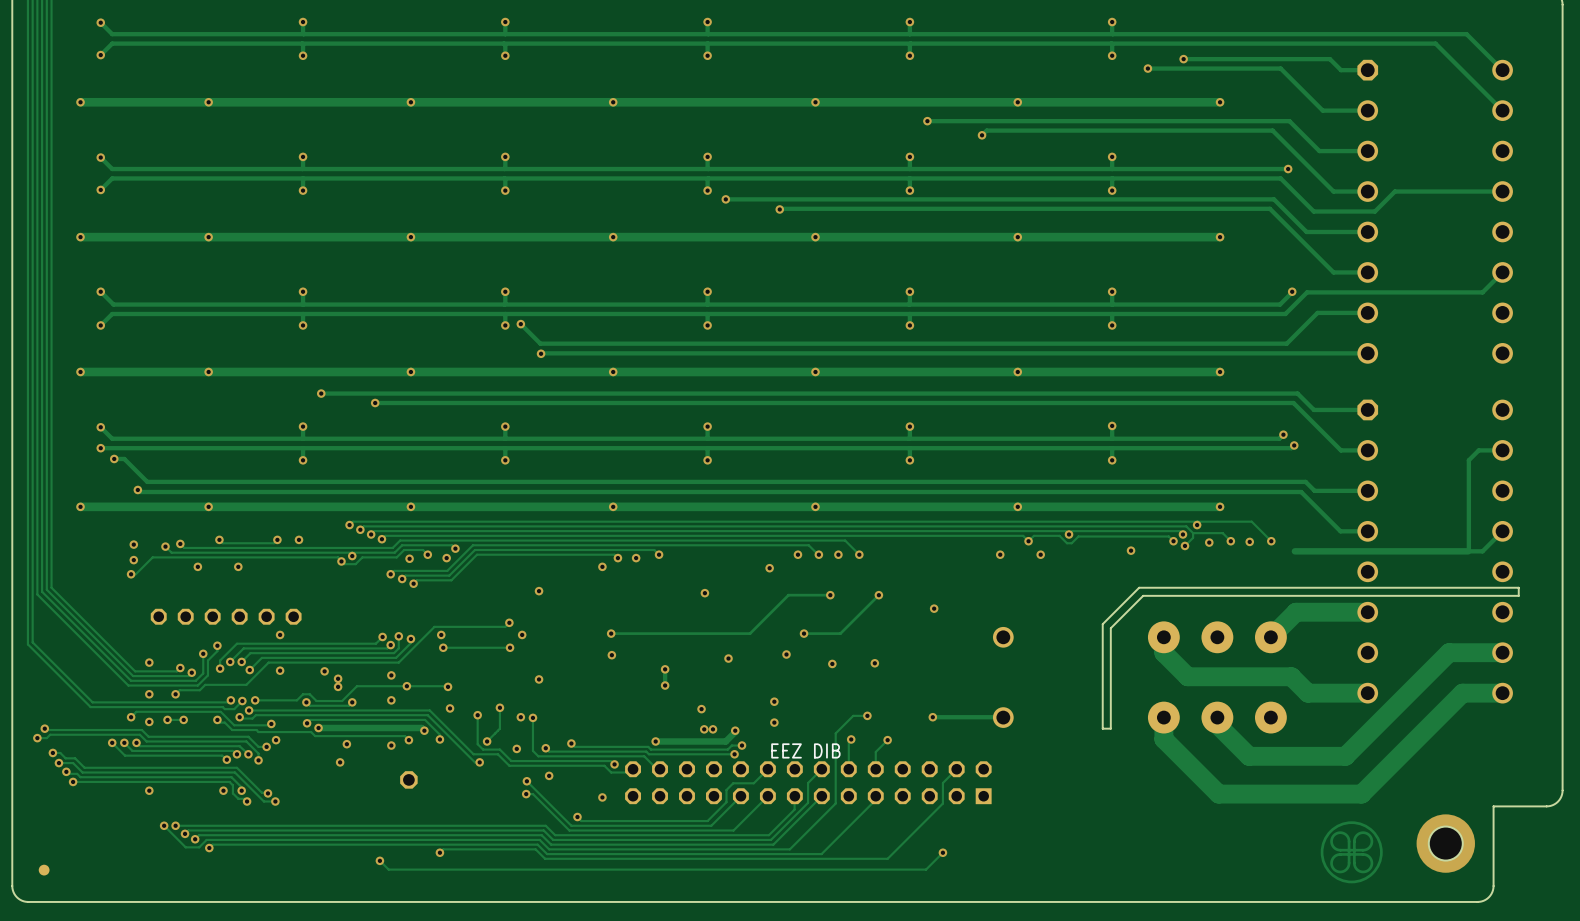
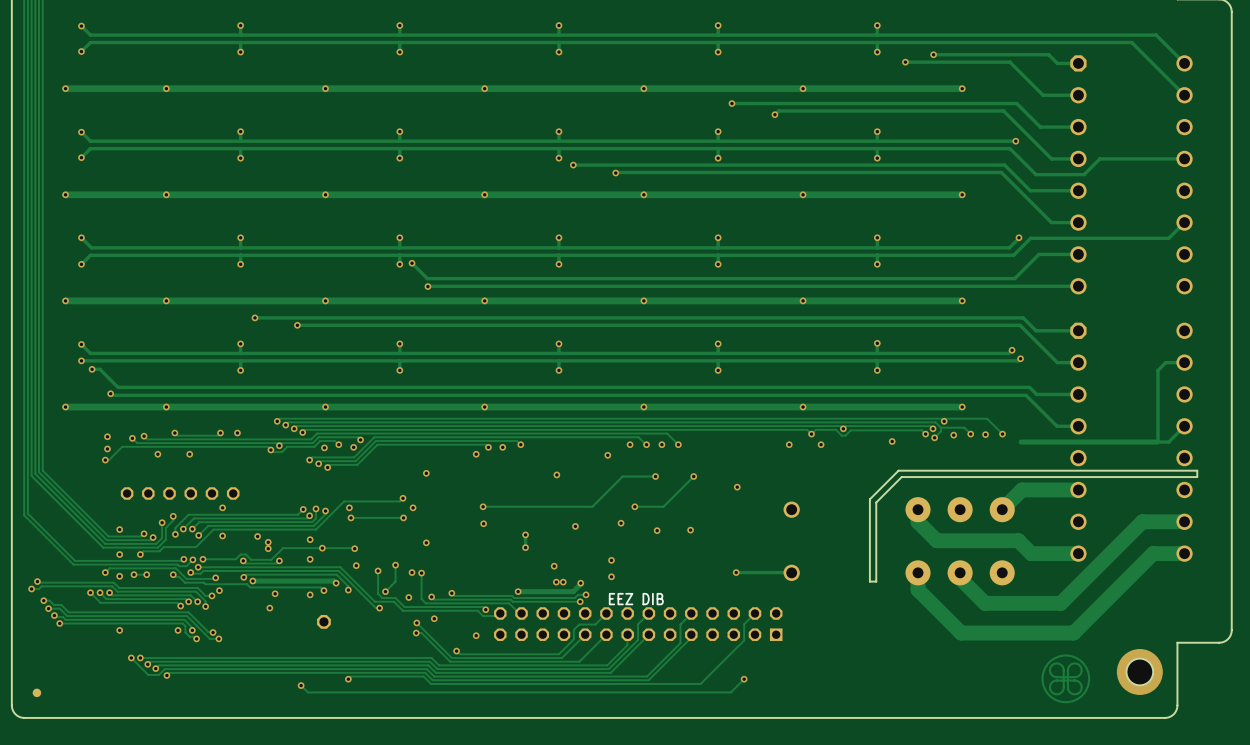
track: (867, 715) (853, 715) (835, 733) (835, 803) (789, 849) -> (691, 613) (680, 624) (680, 643) (647, 676) (623, 676)
via: (867, 715) -> none
track: (851, 739) (848, 741) (848, 769) -> none
via: (851, 739) -> none
track: (887, 740) (875, 751) (875, 769) -> none
via: (887, 740) -> none

